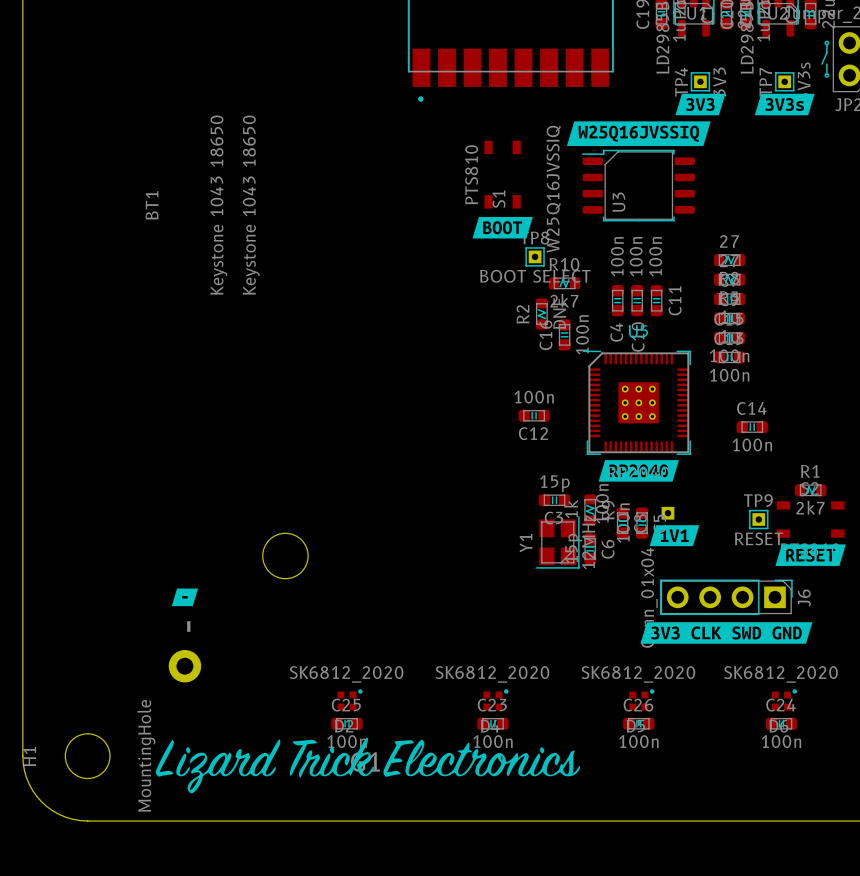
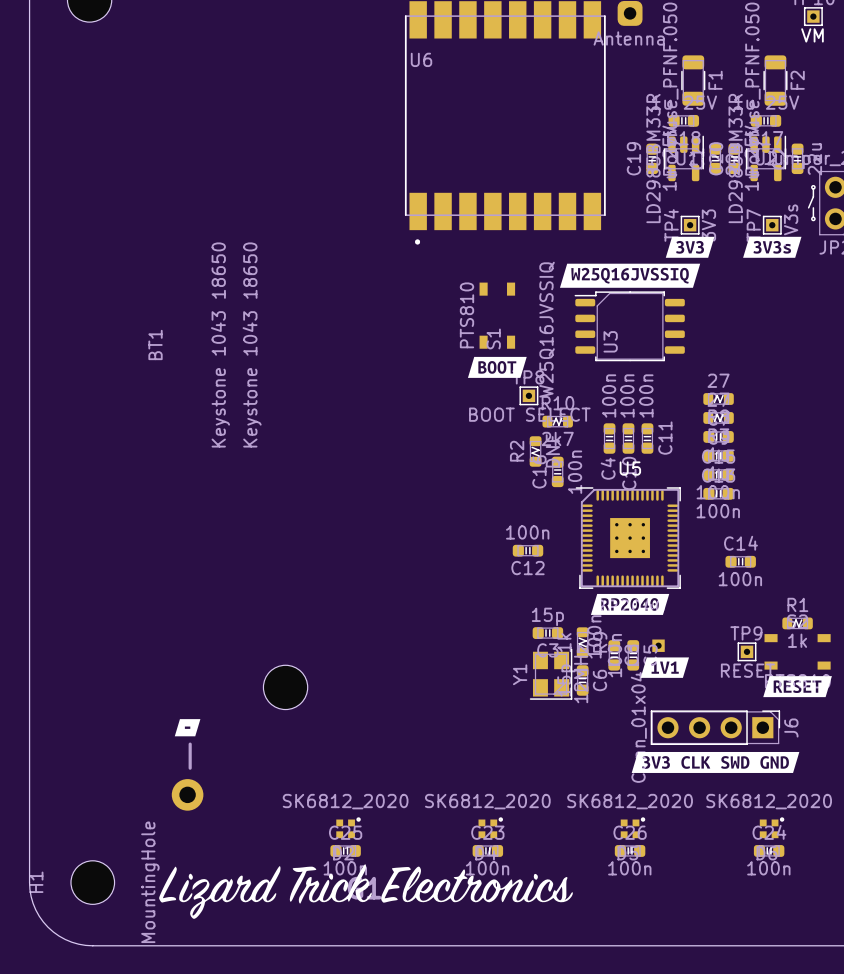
R1 value: 2k7 (810, 507) -> 1k (797, 640)

